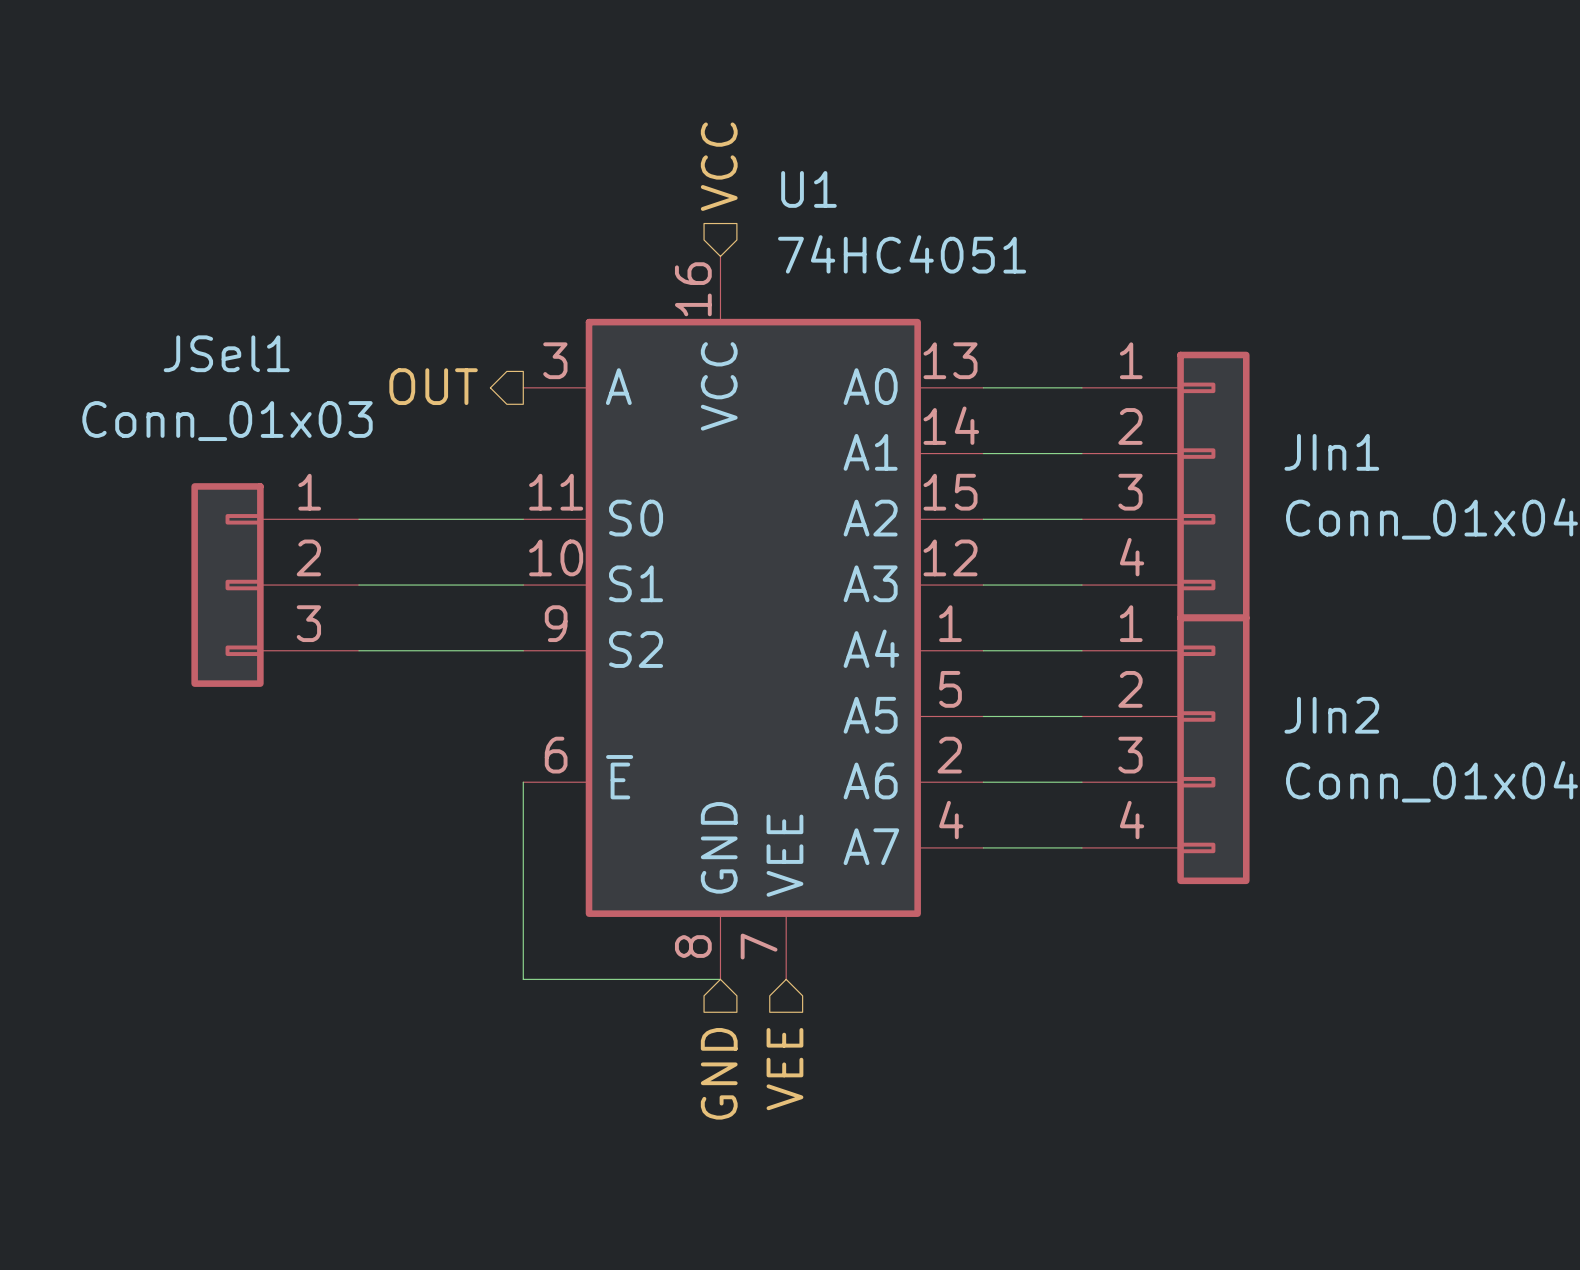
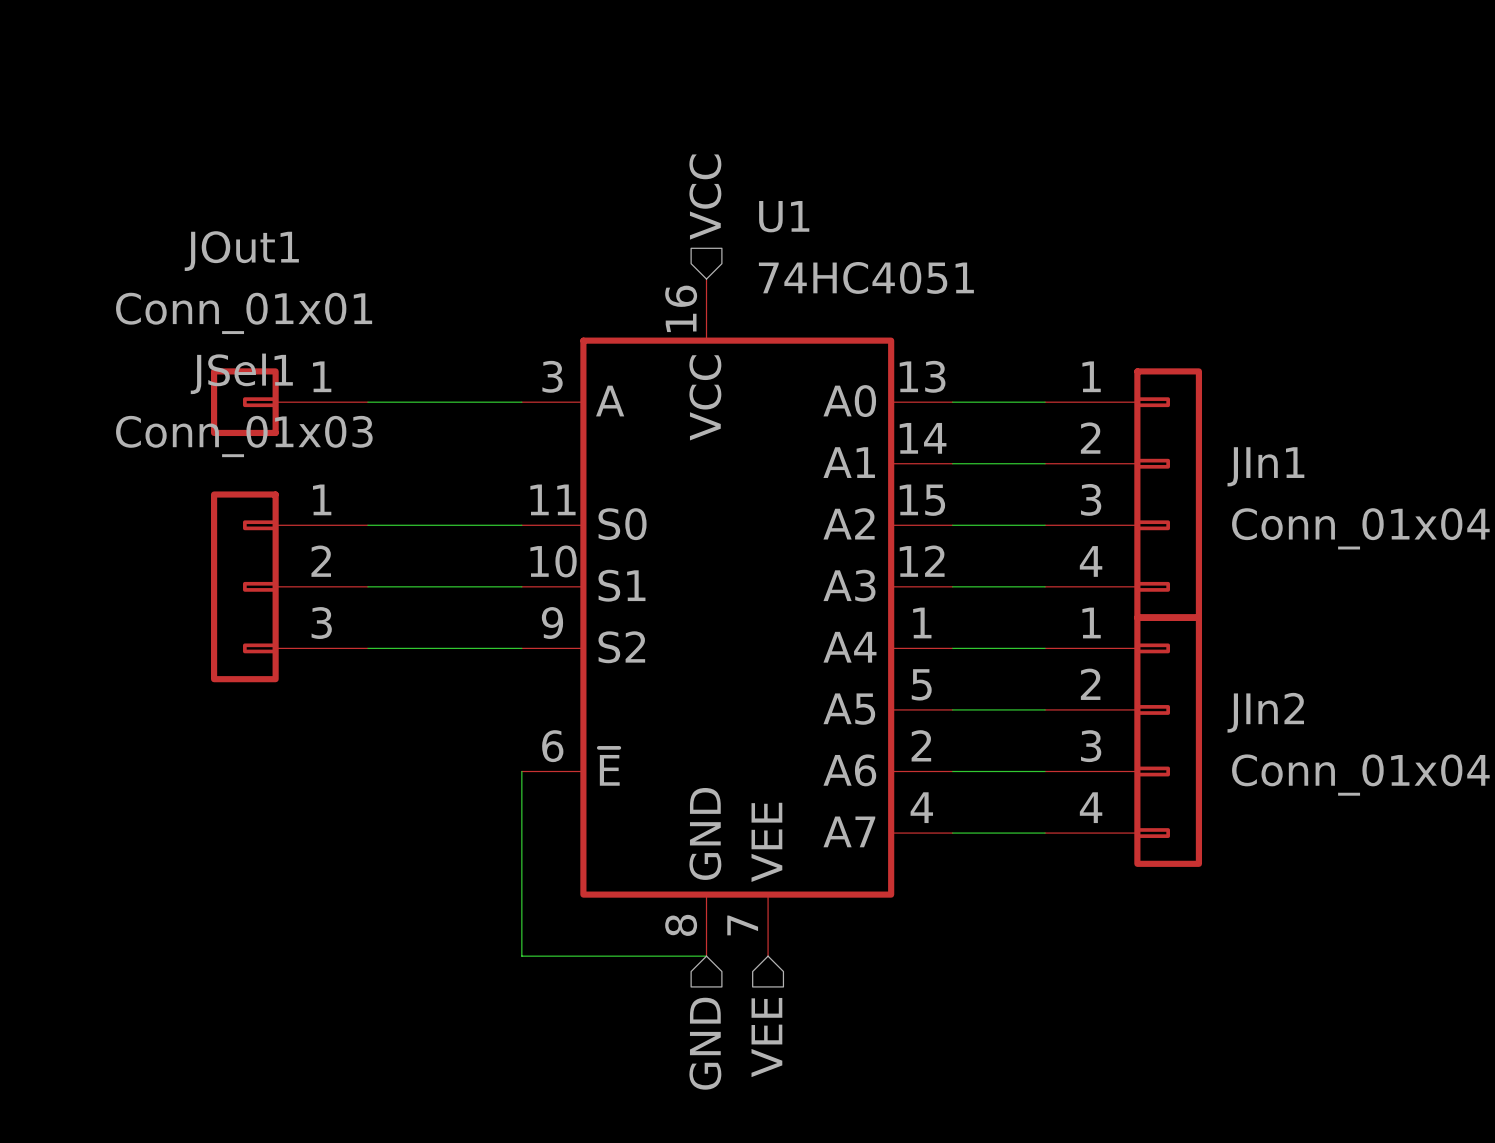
hierarchical label: OUT (433, 386) -> none
JOut1: none -> Conn_01x01 (289, 402)
wire: none -> (367, 402) (521, 402)

